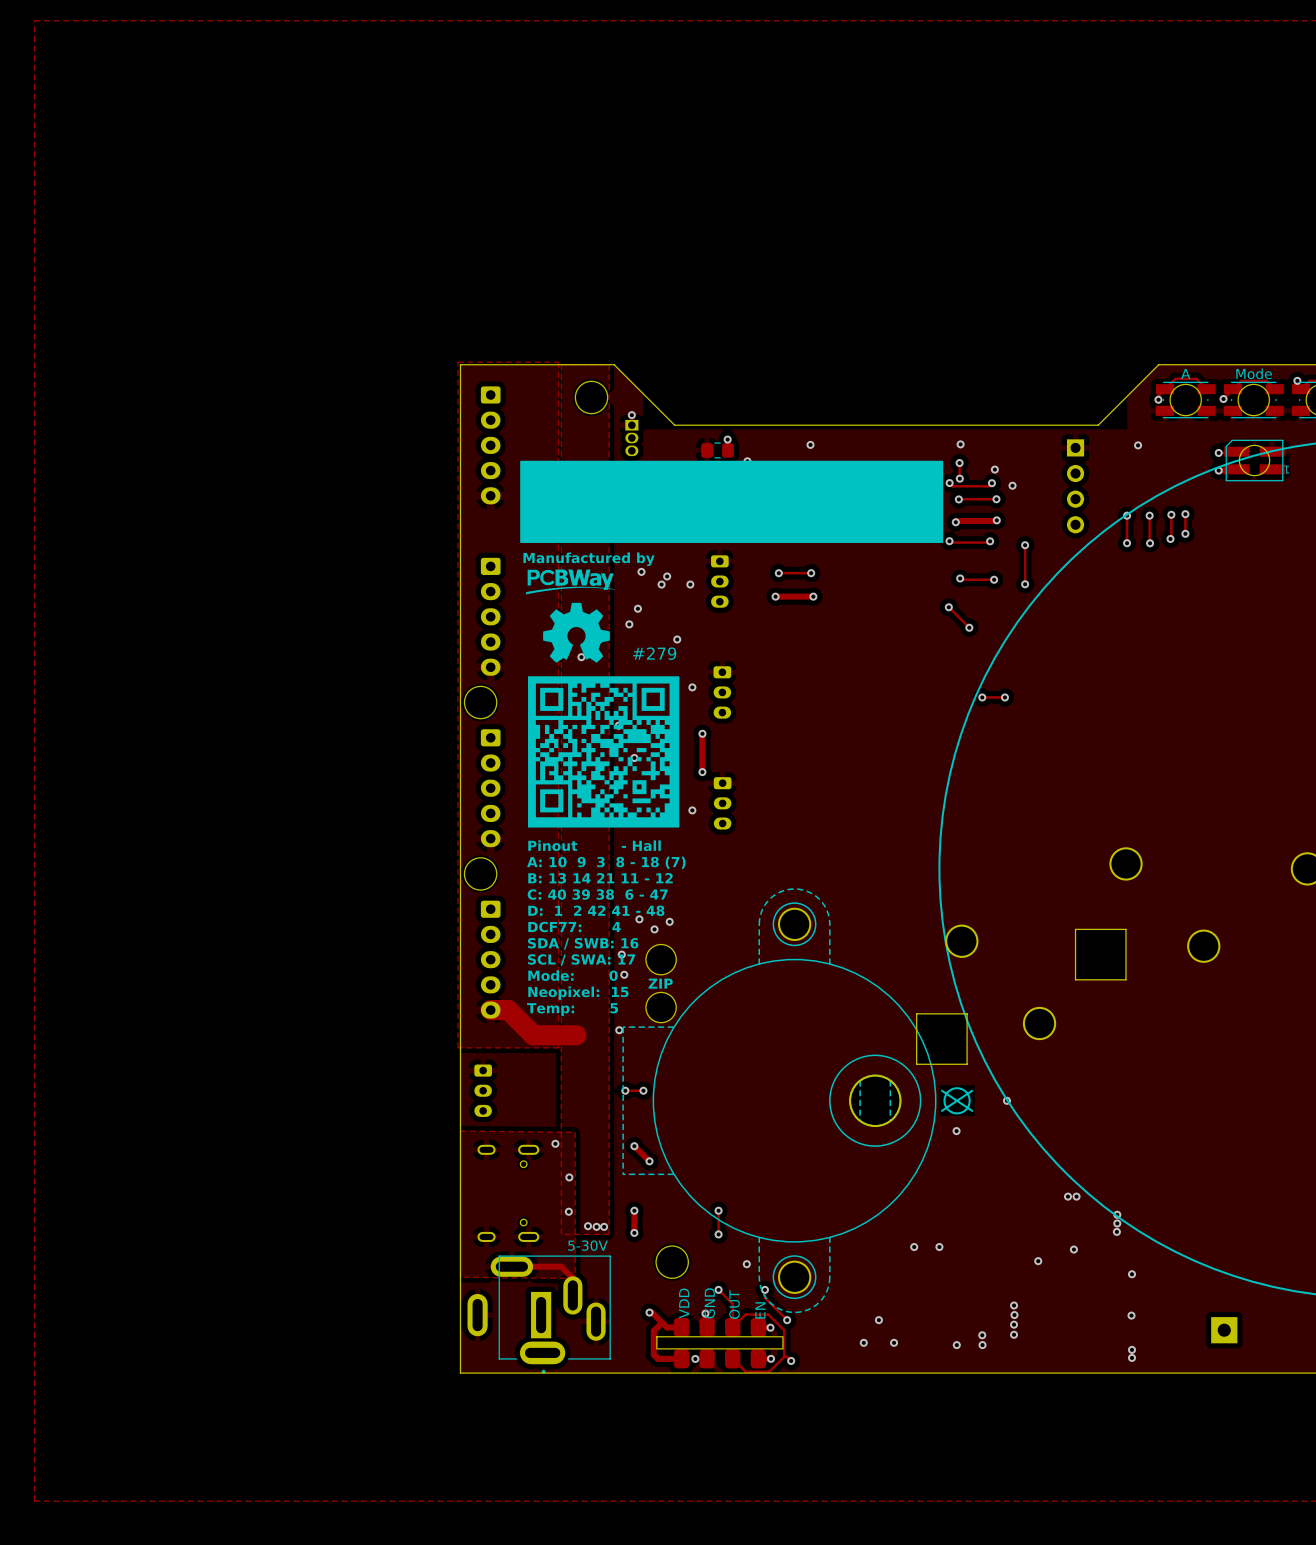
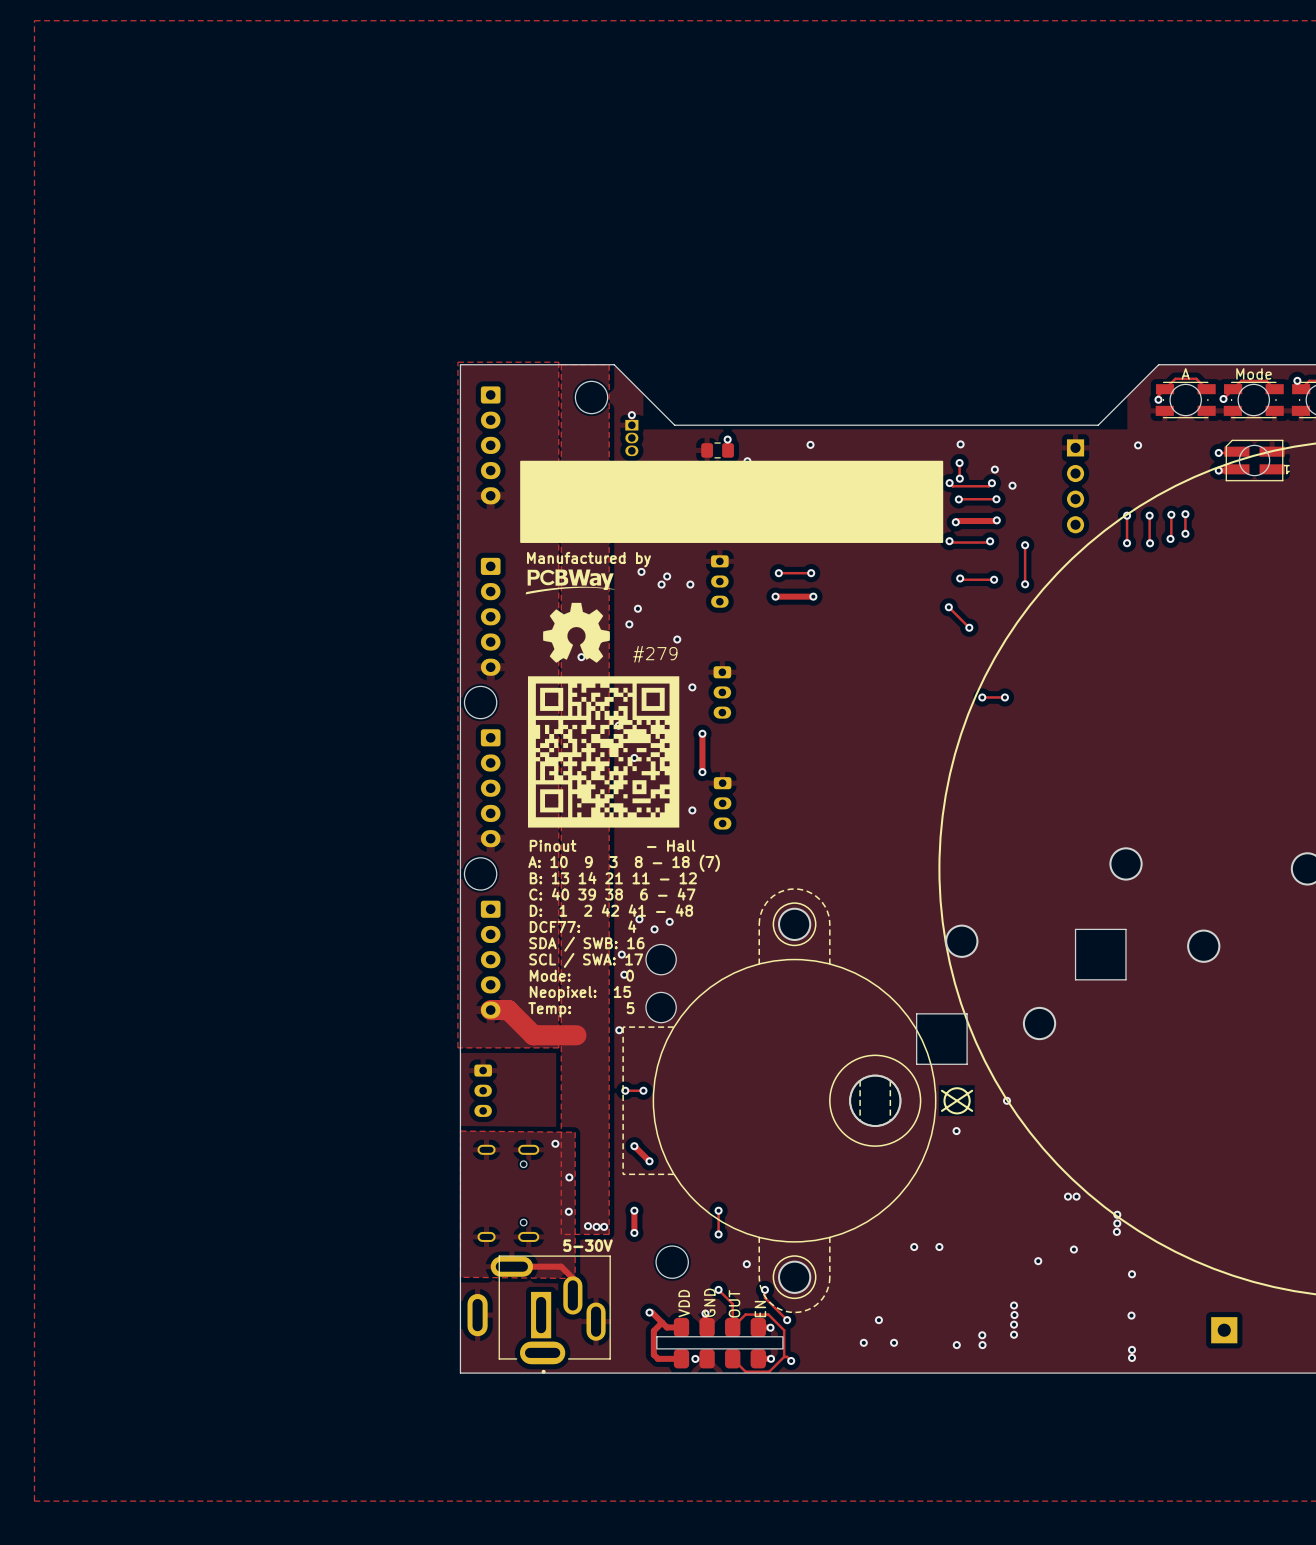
text: ZIP (660, 983) -> none

